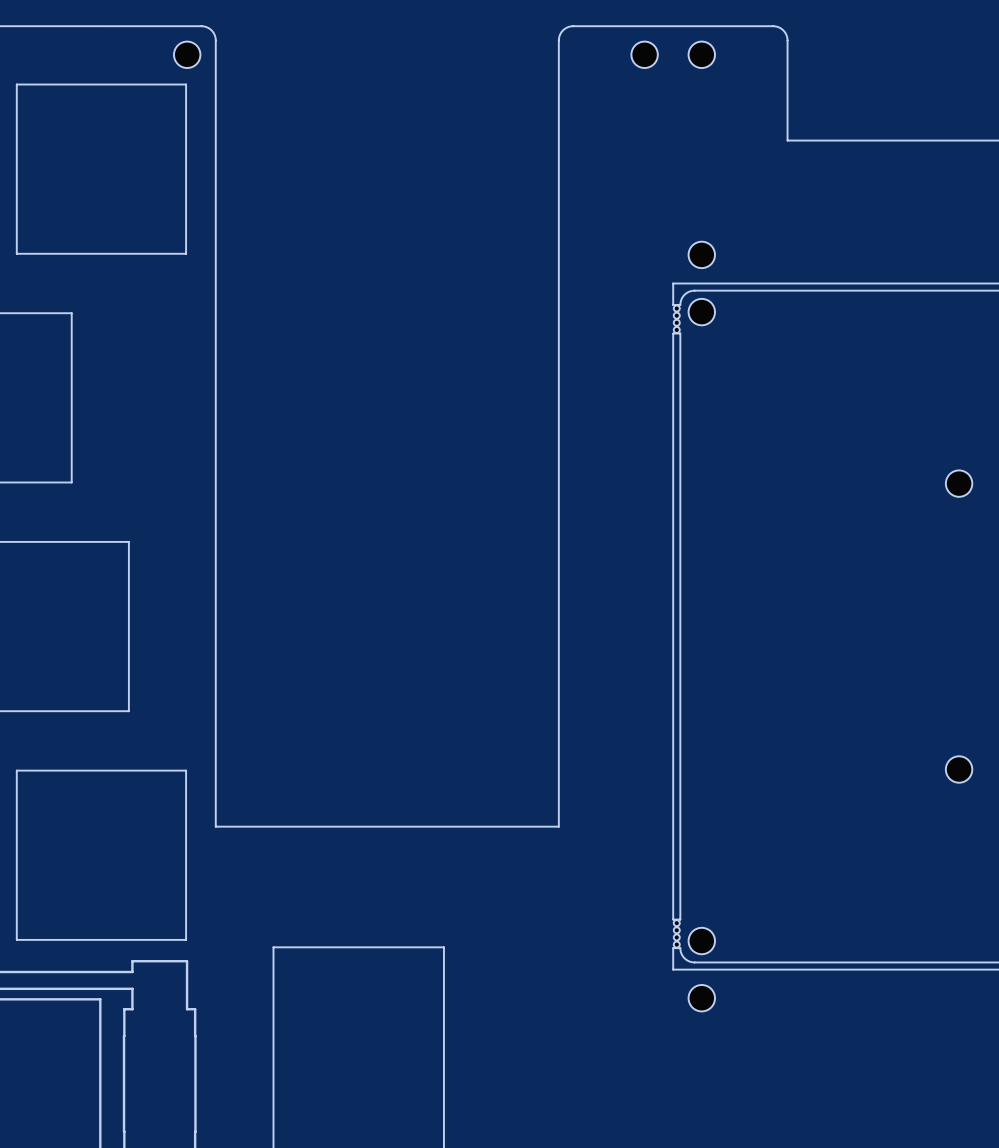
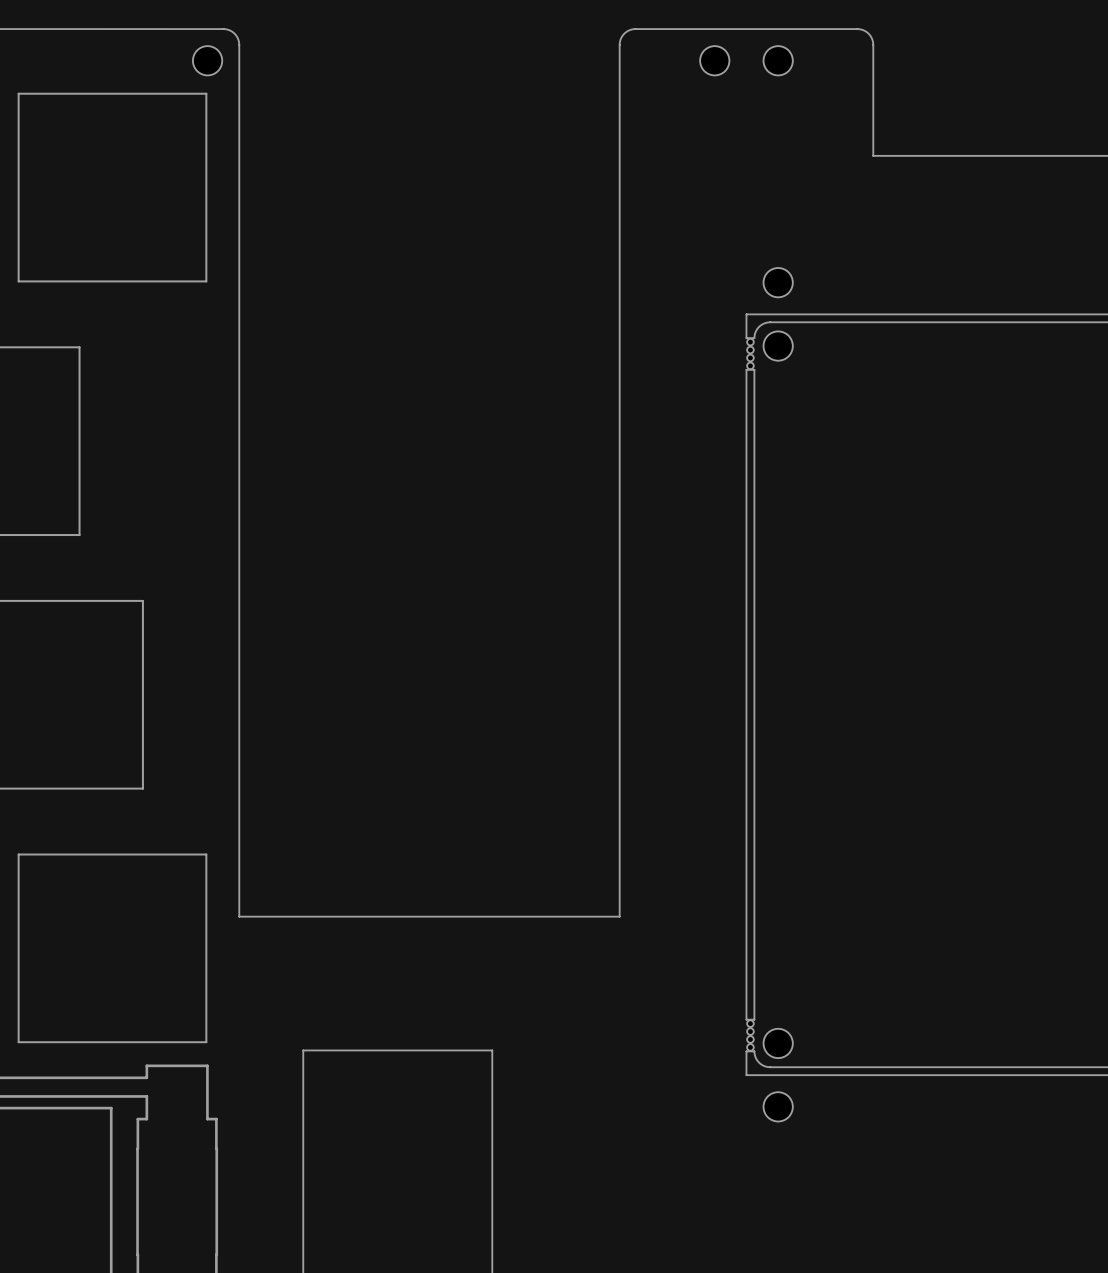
part: (959, 483) -> none
part: (959, 769) -> none

